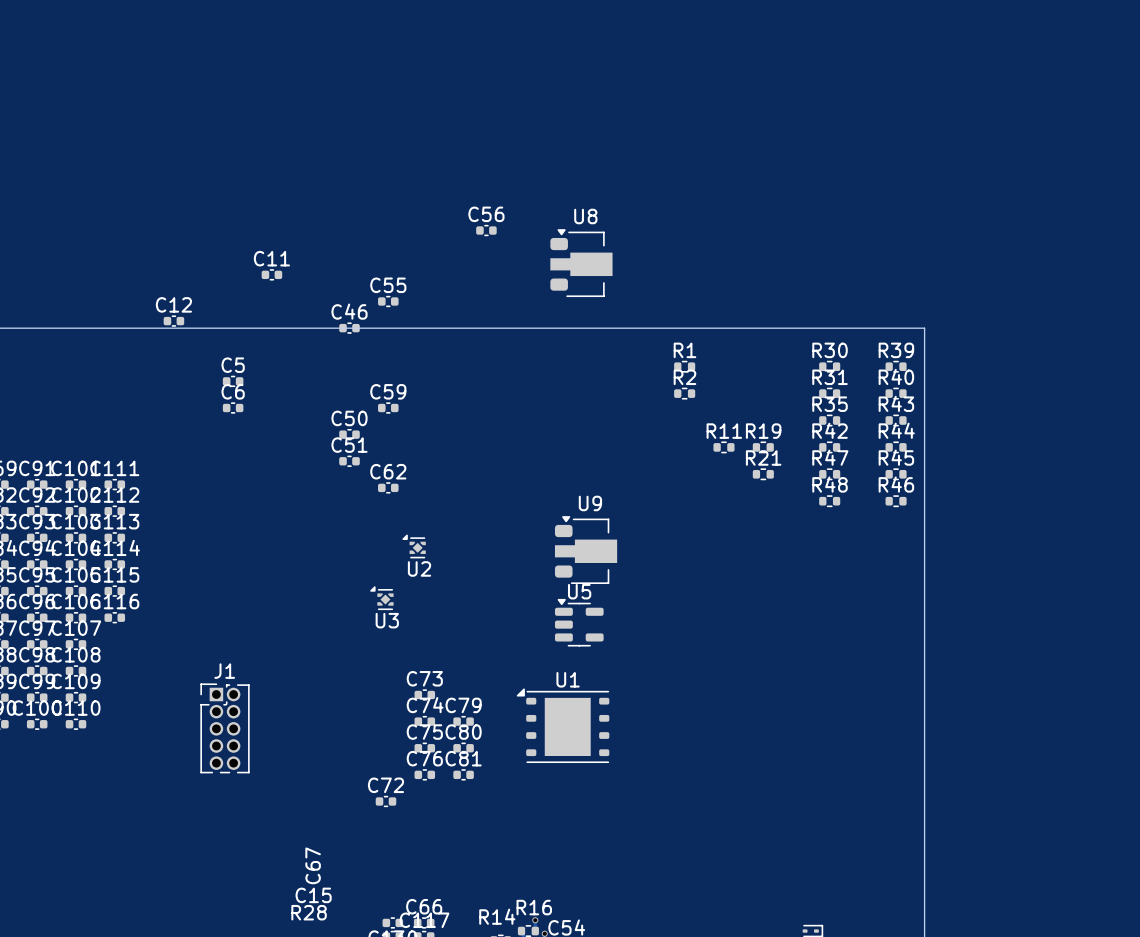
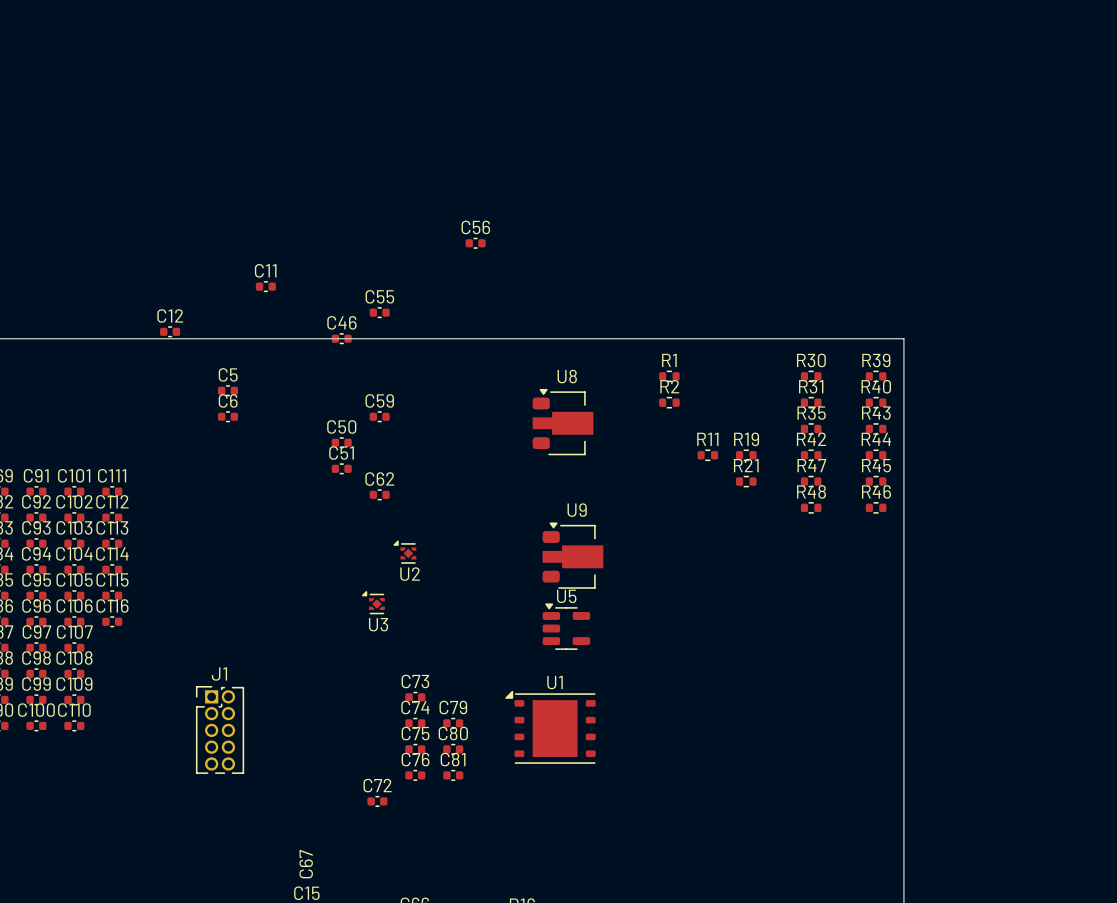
U8 position: (581, 263) -> (563, 422)

